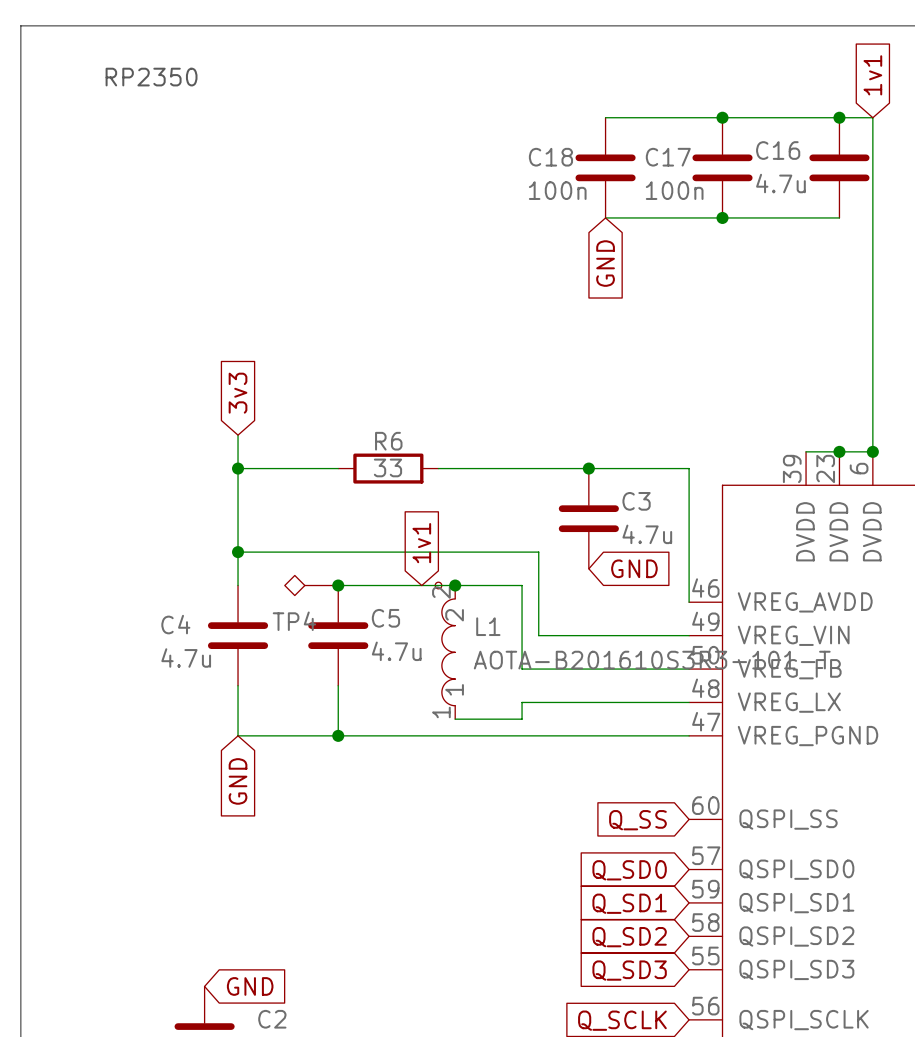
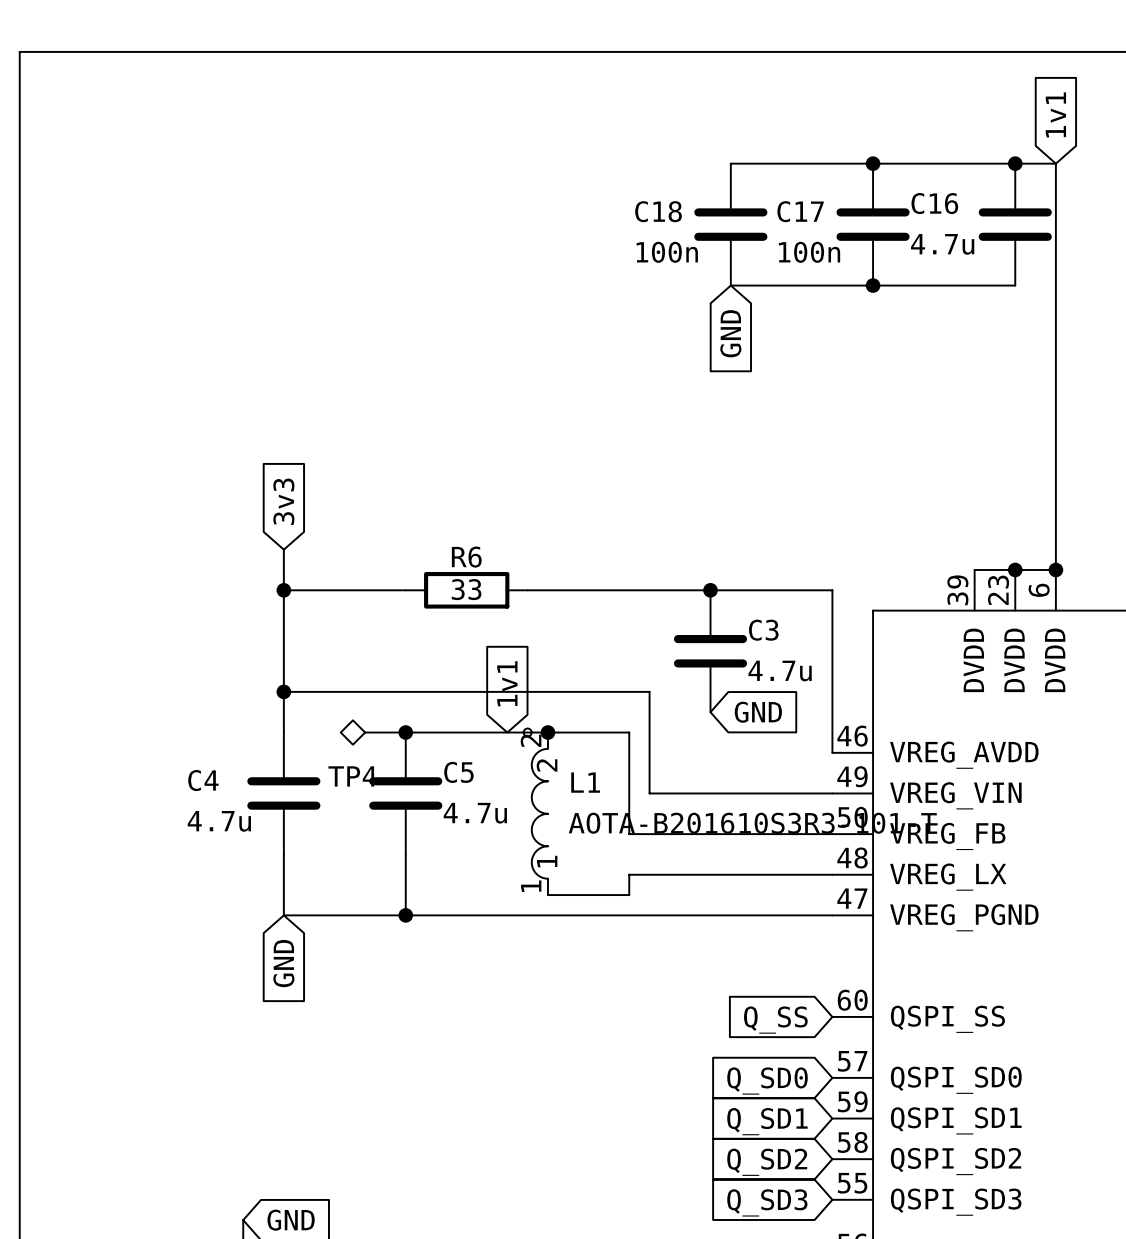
text: RP2350 (151, 77) -> none

